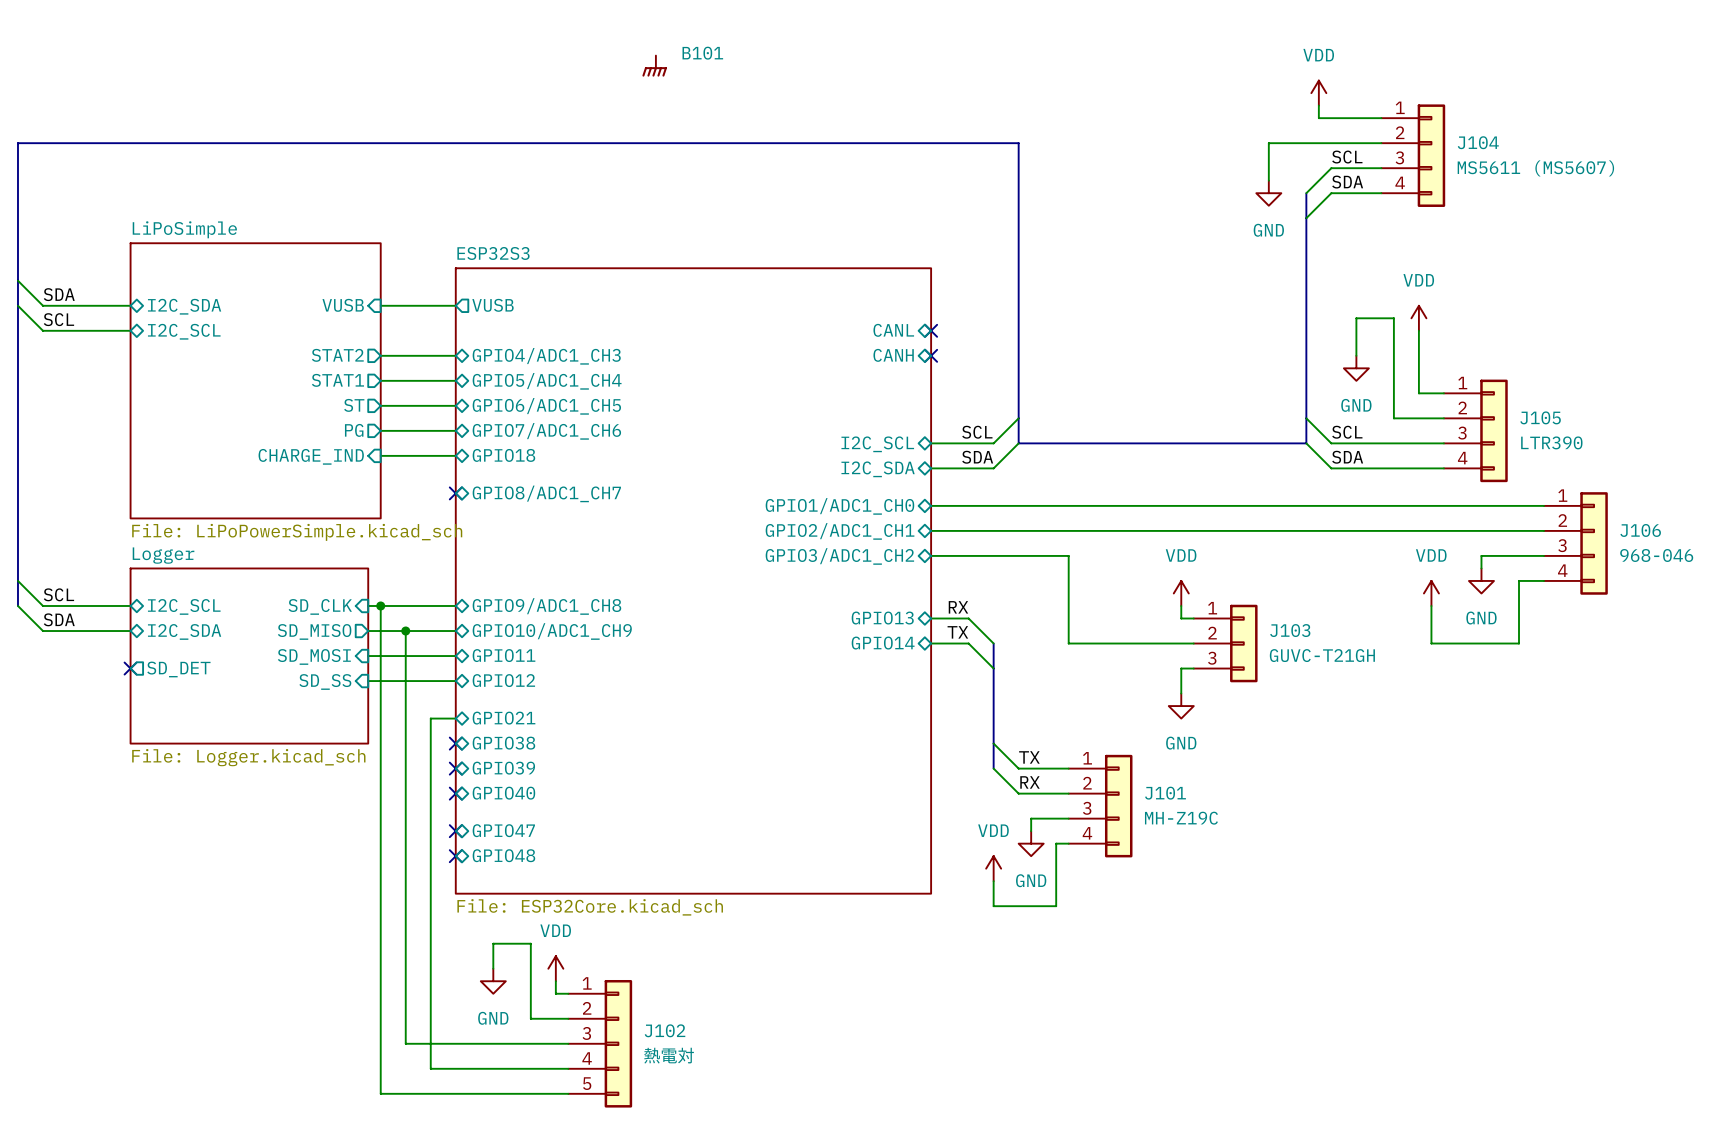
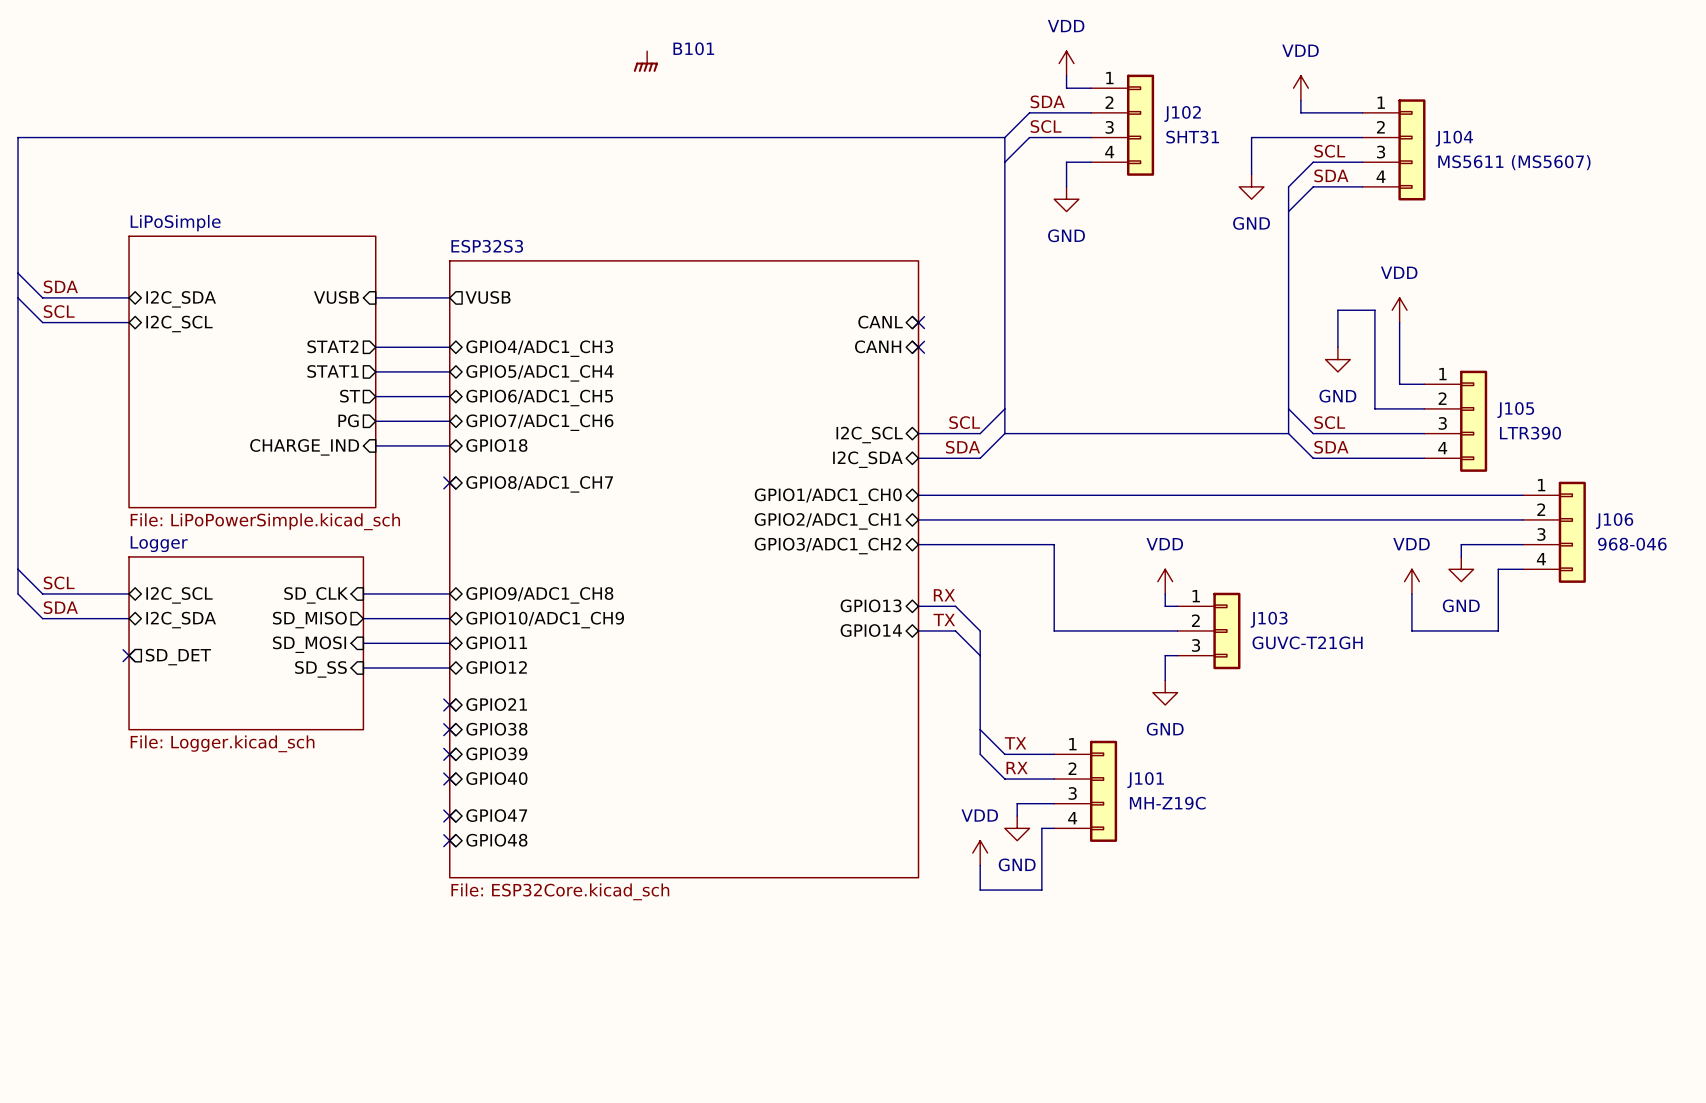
power symbol: none -> VDD (1066, 63)
wire: none -> (1066, 75) (1066, 88) (1091, 88)
label: none -> SDA (1047, 101)
wire: none -> (1091, 112) (1029, 112) (1004, 137)
label: none -> SCL (1046, 126)
wire: none -> (1091, 137) (1029, 137) (1004, 162)
wire: none -> (1091, 162) (1066, 162) (1066, 186)
power symbol: none -> GND (1066, 199)
wire: (380, 605) (380, 1093) (568, 1093) -> none
junction: (380, 605) -> none
wire: (405, 631) (405, 1043) (568, 1043) -> none
junction: (405, 631) -> none
wire: (455, 718) (430, 718) (430, 1068) (568, 1068) -> none
no-connect mark: none -> (449, 705)
wire: (493, 968) (493, 943) (530, 943) (530, 1018) (568, 1018) -> none
power symbol: VDD (555, 968) -> none
J102 symbol: [568, 979, 633, 1108] -> [1091, 74, 1155, 176]
power symbol: GND (493, 981) -> none
wire: (555, 981) (555, 993) (568, 993) -> none
J102 value: 熱電対 (669, 1055) -> SHT31 (1192, 137)

